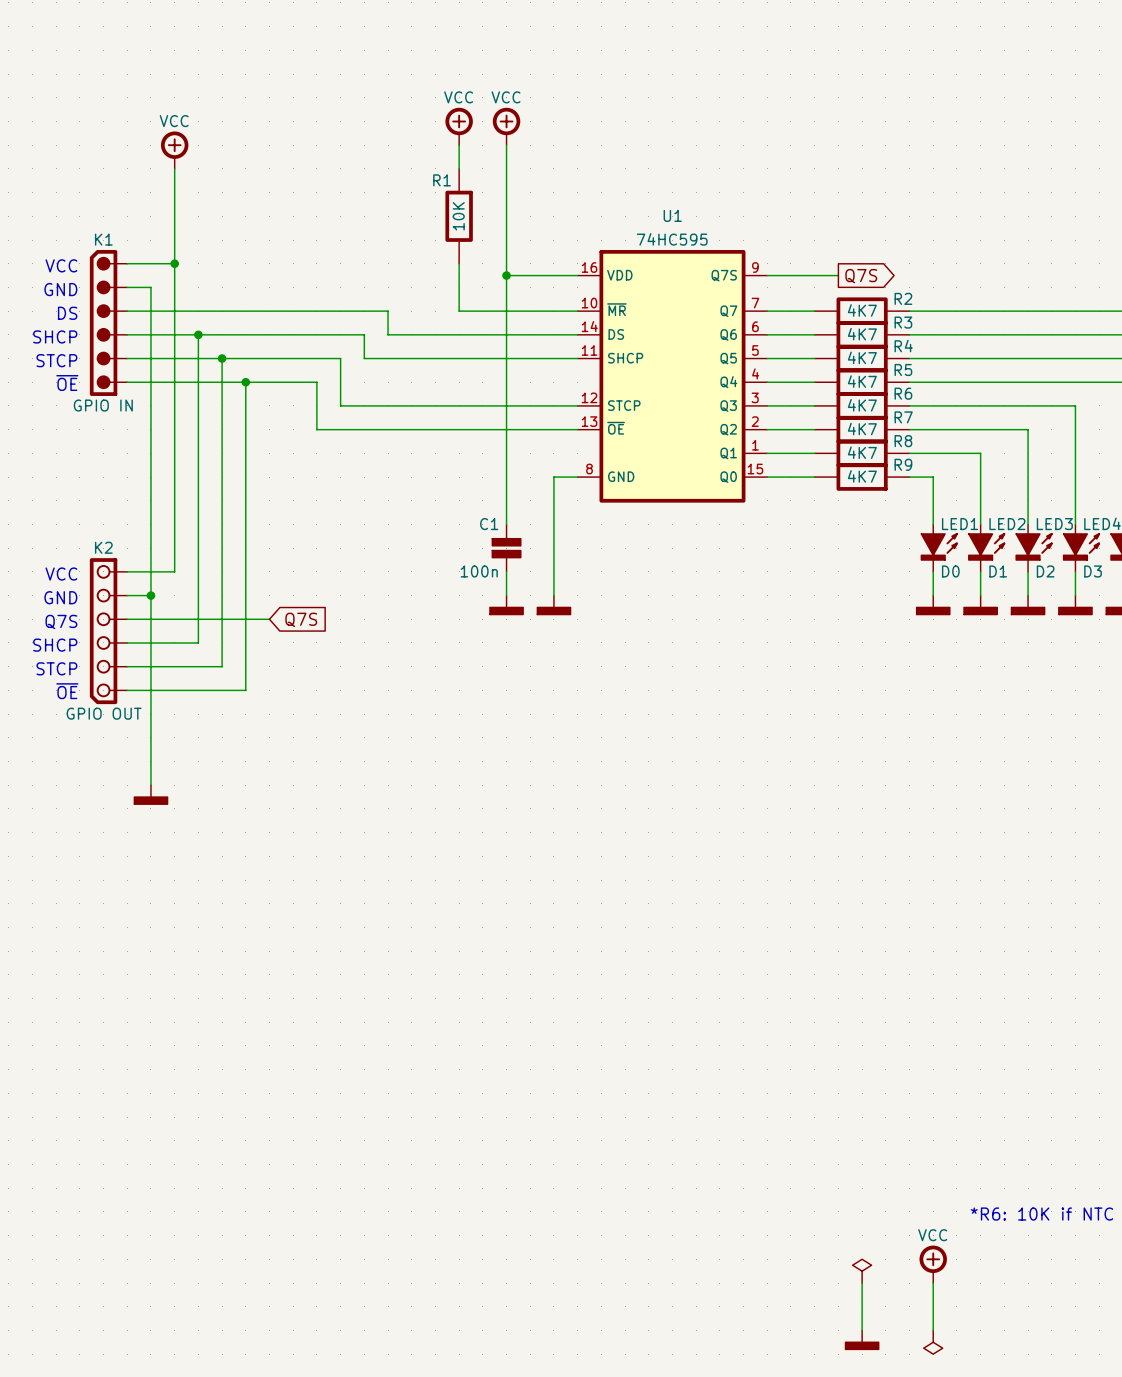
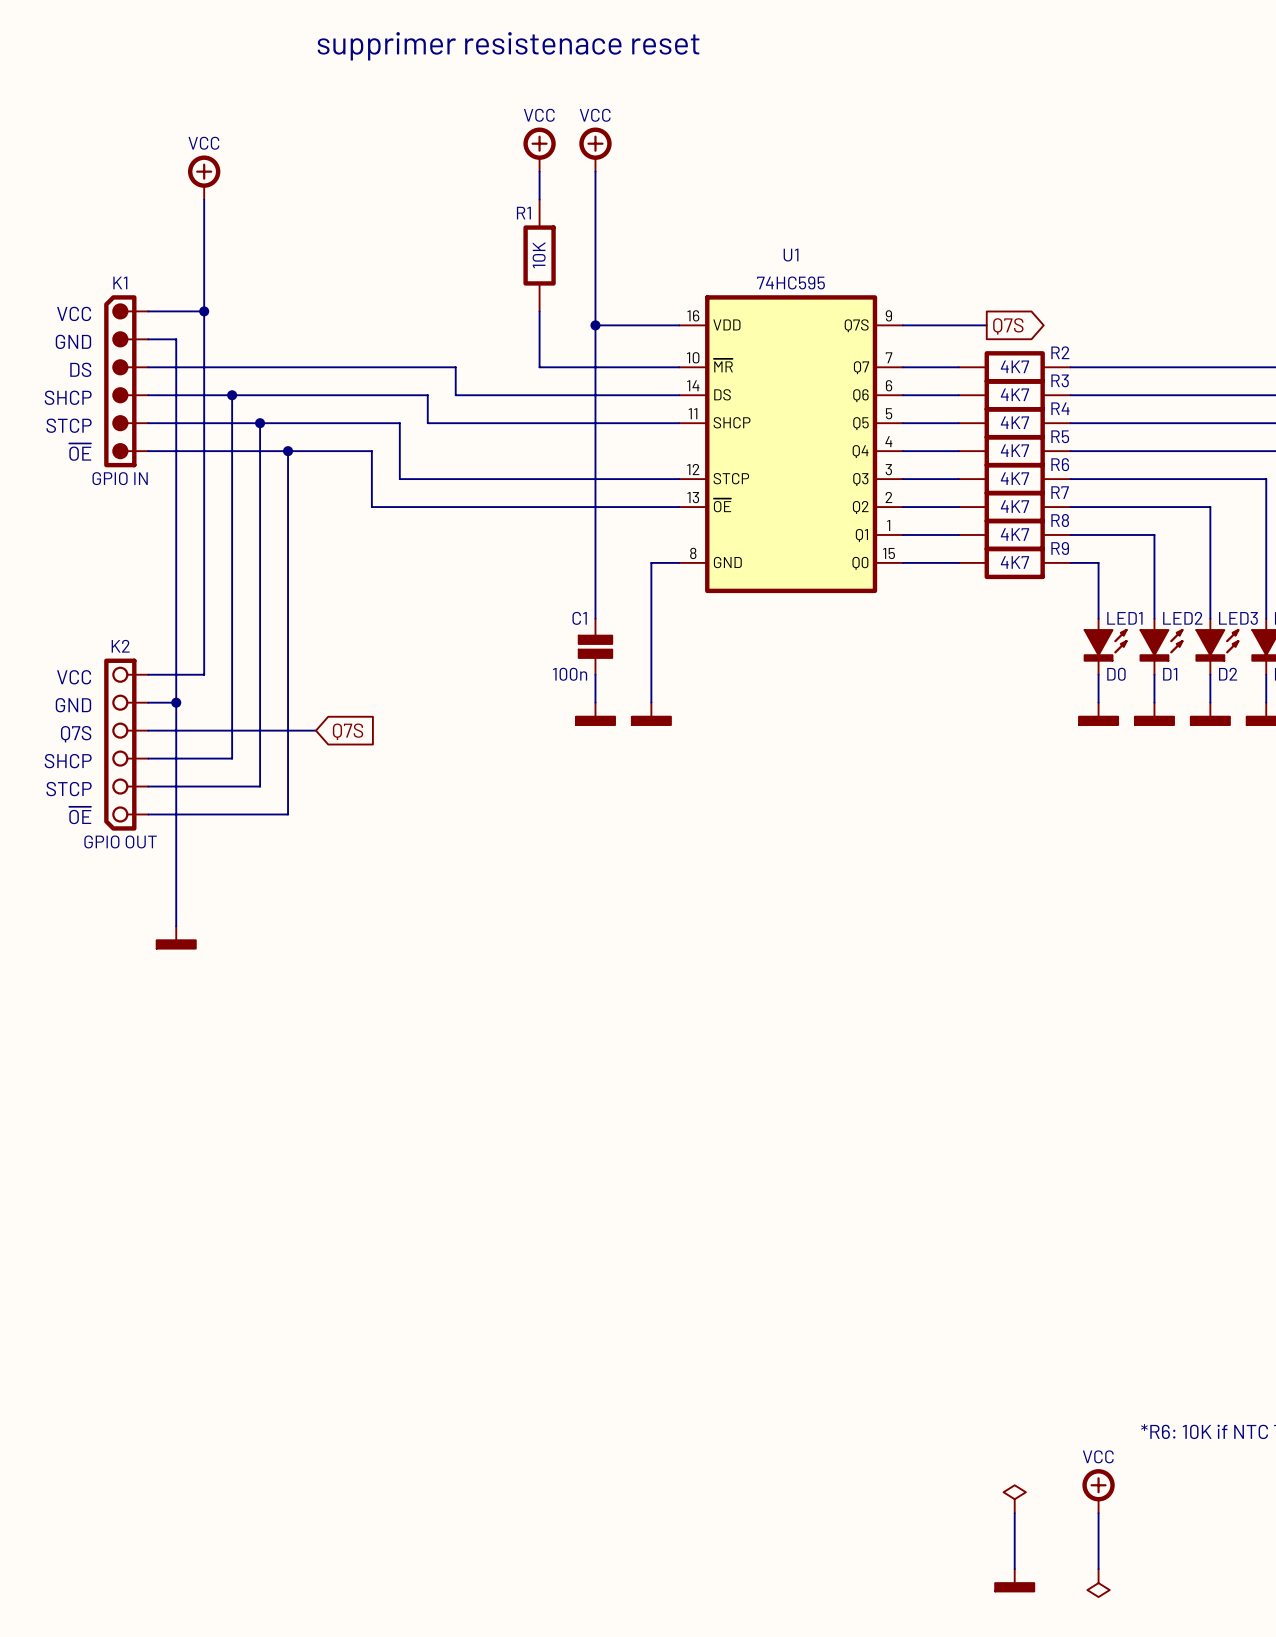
text: none -> supprimer resistenace reset (508, 46)

